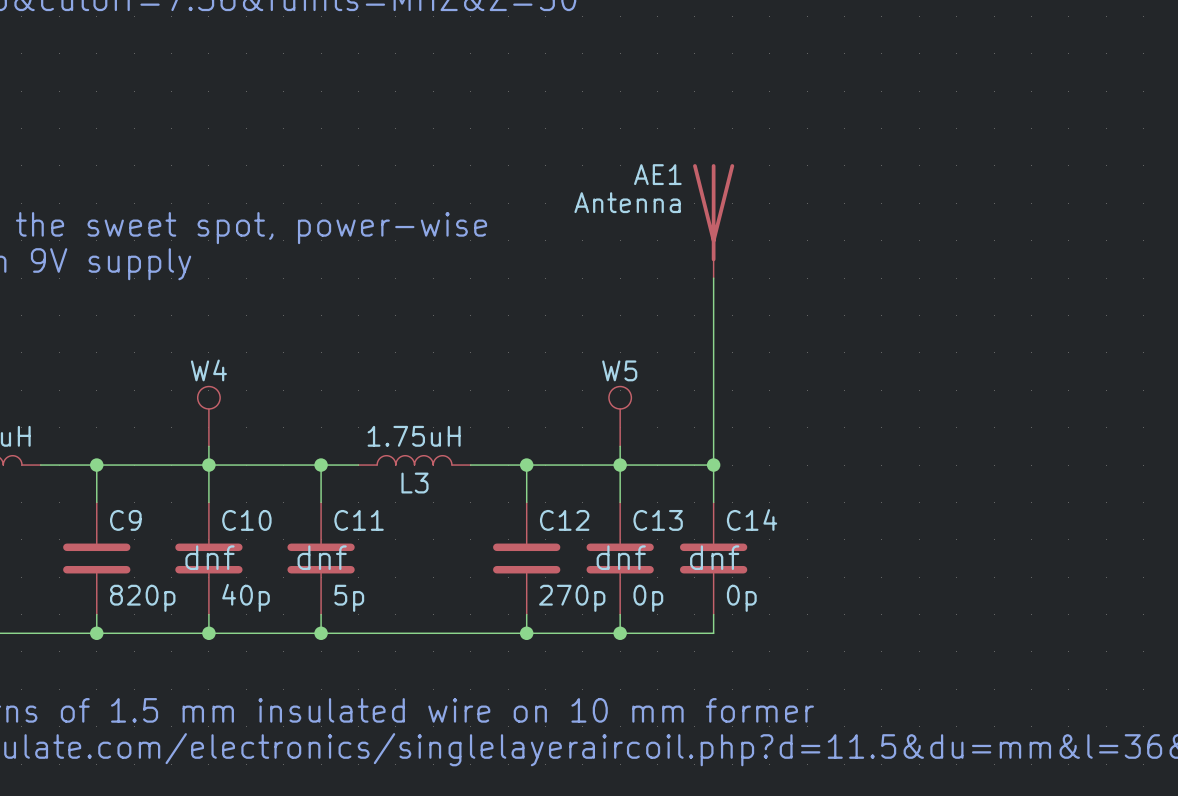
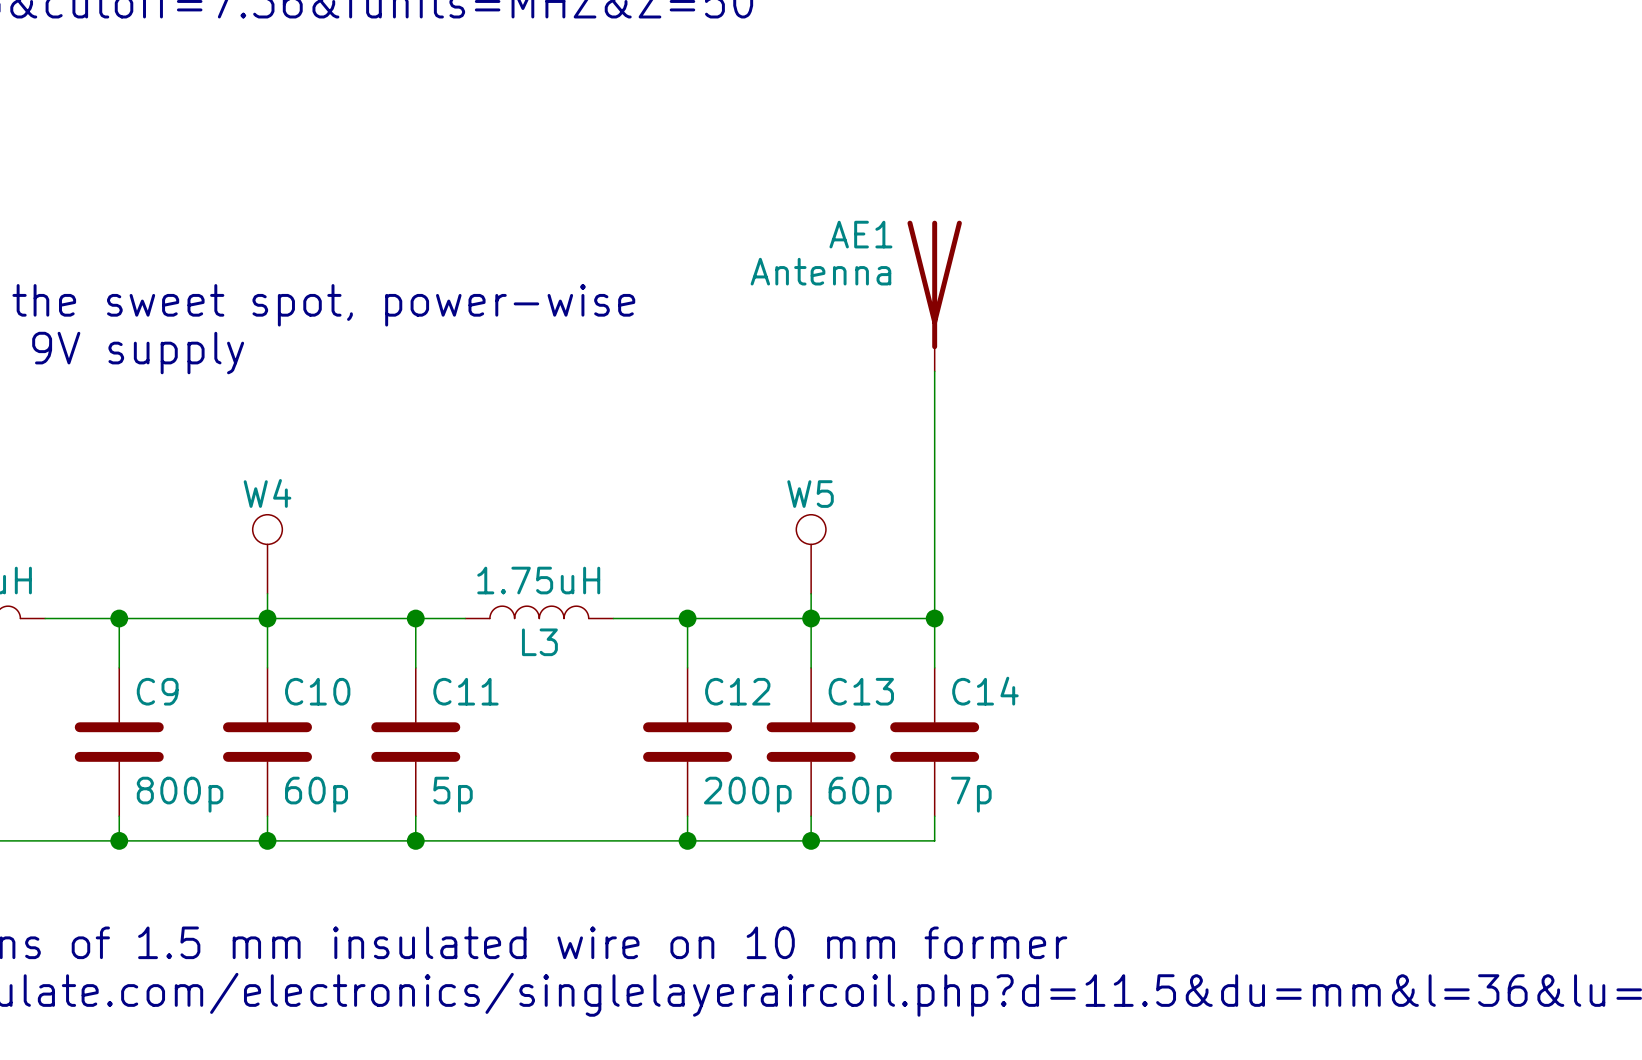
C10 text: dnf (209, 557) -> none
C11 text: dnf (322, 557) -> none
C13 text: dnf (621, 557) -> none
C14 text: dnf (714, 557) -> none
C10 value: 40p (246, 597) -> 60p (316, 794)
C9 value: 820p (142, 598) -> 800p (180, 794)
C12 value: 270p (572, 598) -> 200p (747, 794)
C13 value: 0p (648, 598) -> 60p (860, 794)
C14 value: 0p (741, 598) -> 7p (971, 794)

